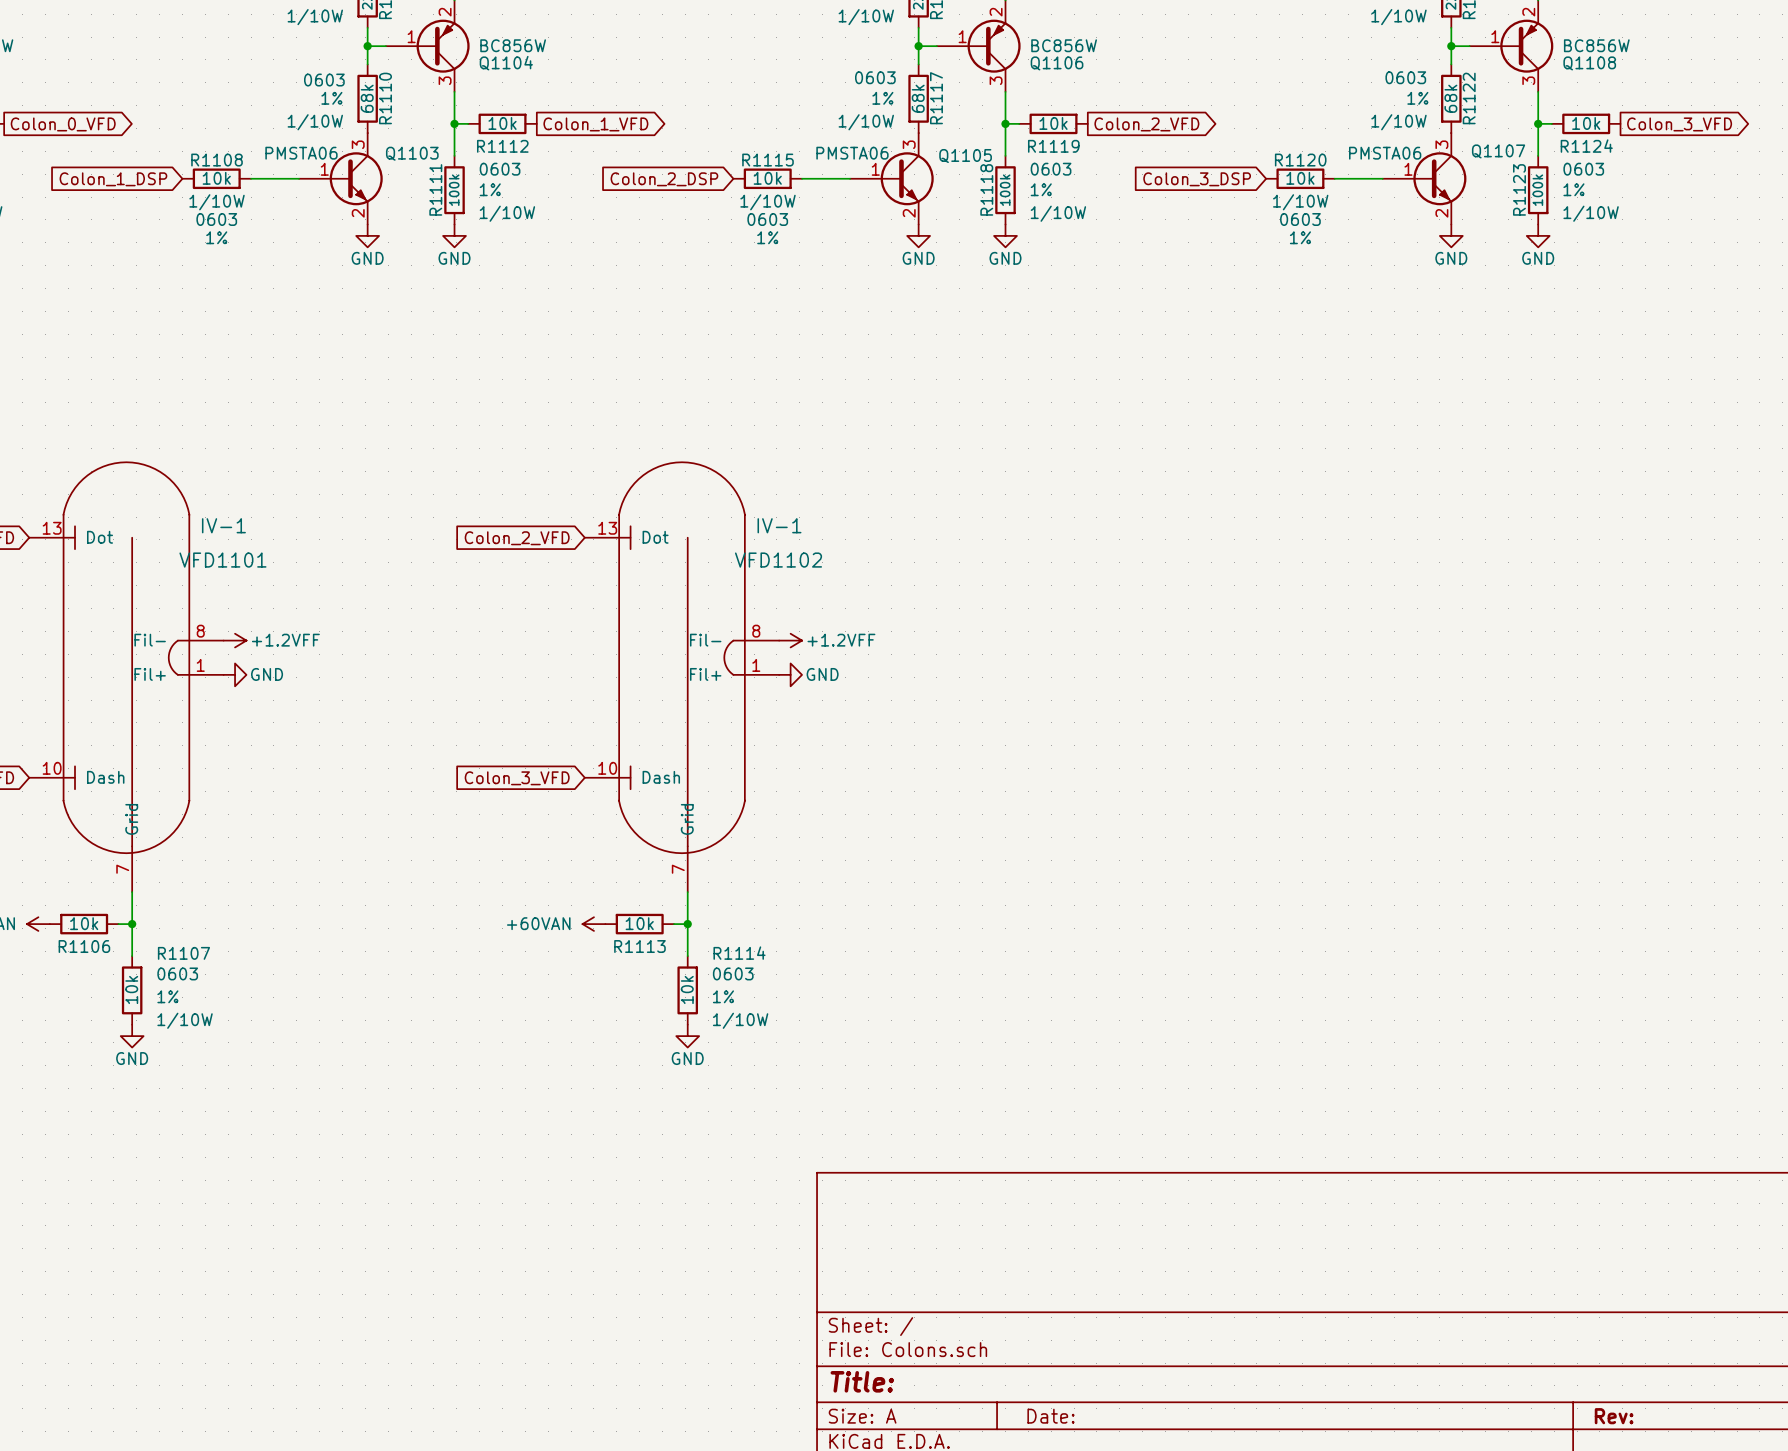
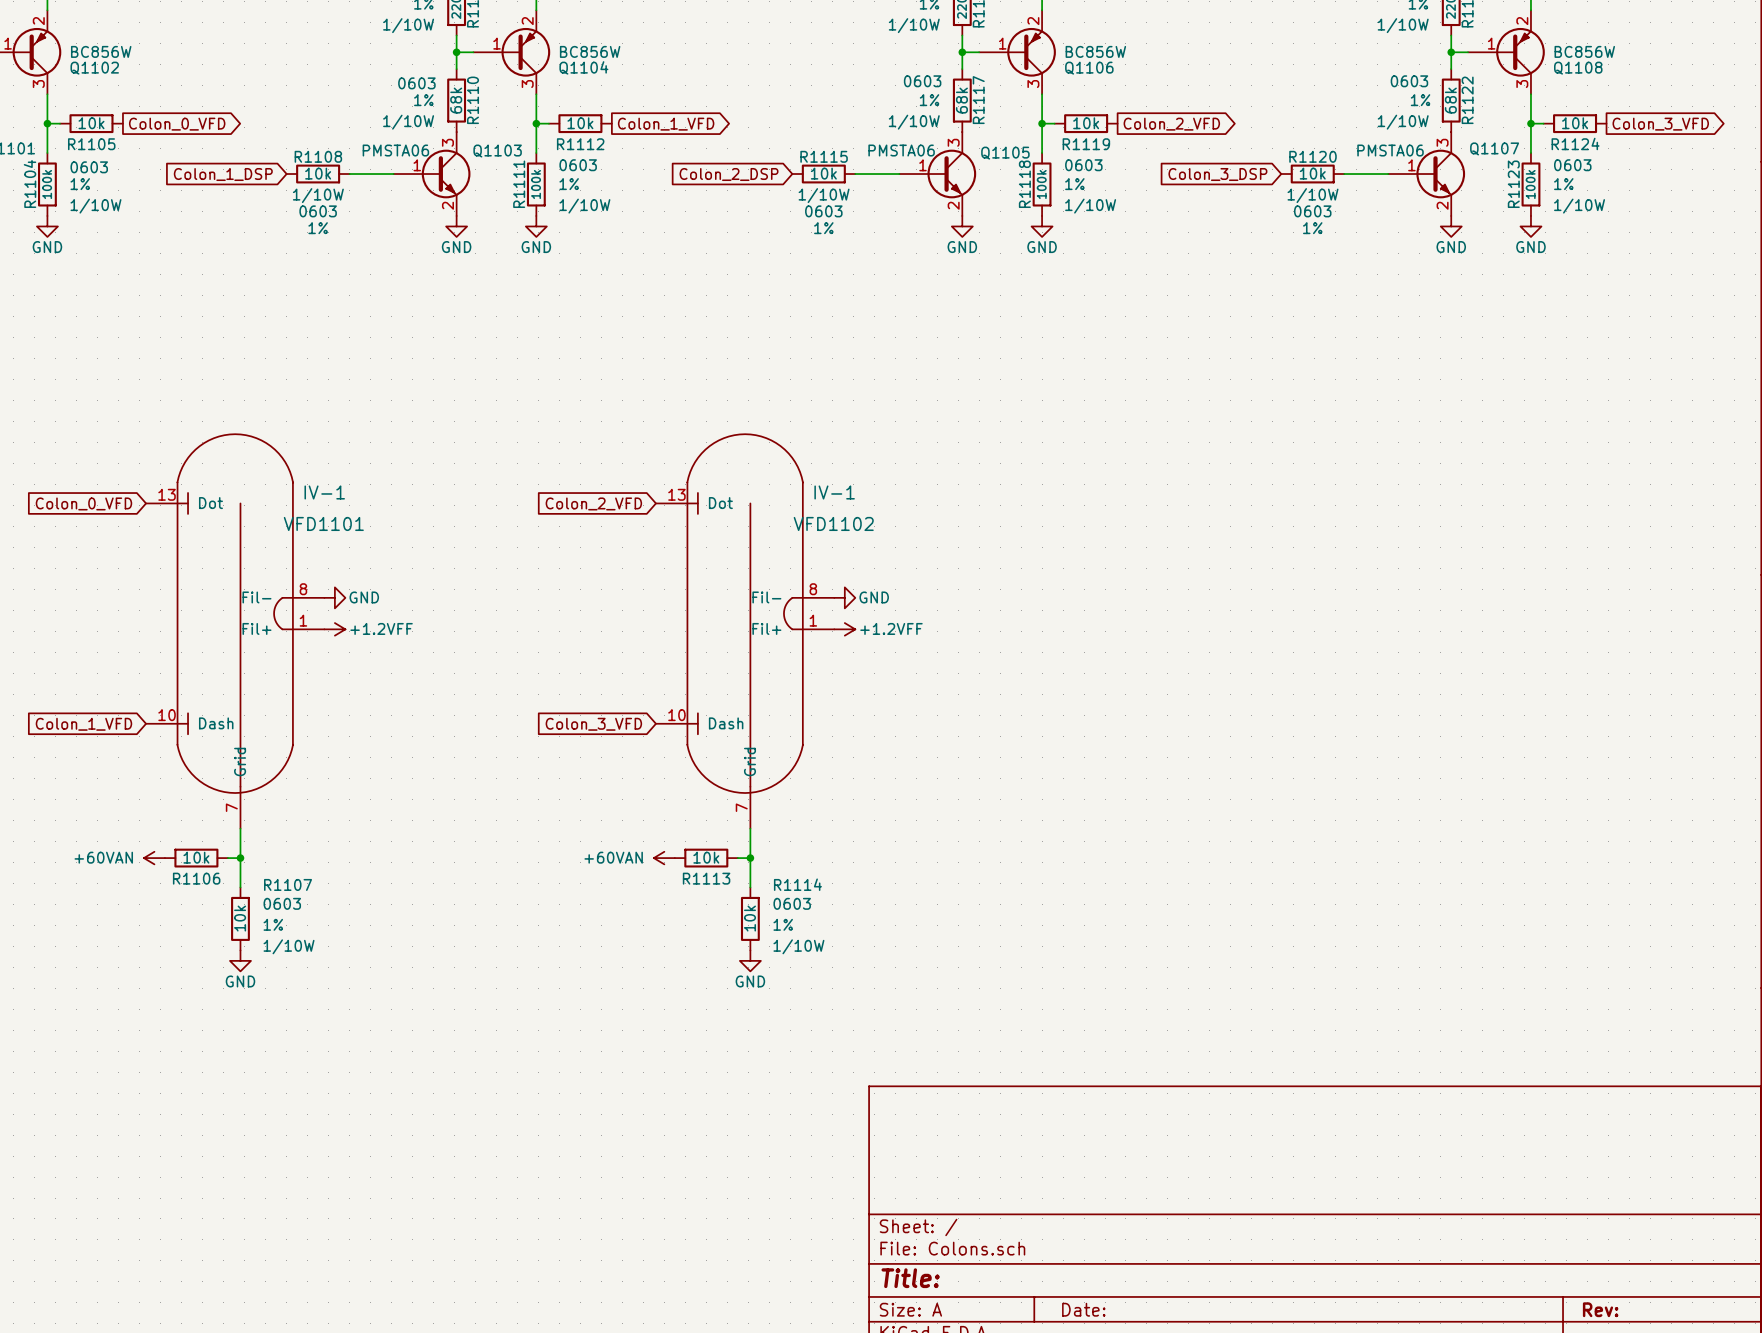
power symbol: +1.2VFF (235, 640) -> GND (334, 597)
power symbol: +1.2VFF (790, 640) -> GND (844, 597)
power symbol: GND (235, 674) -> +1.2VFF (334, 629)
power symbol: GND (790, 674) -> +1.2VFF (844, 629)

